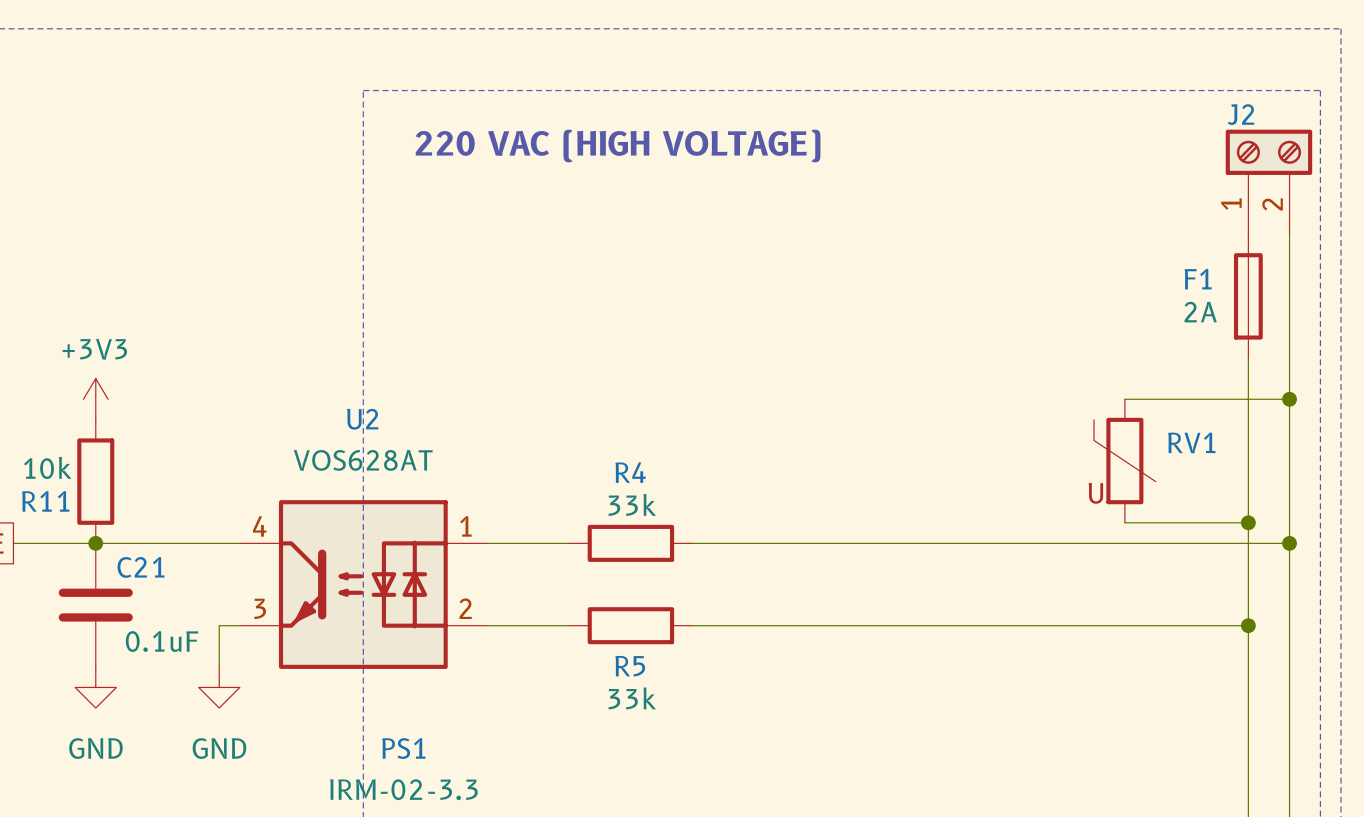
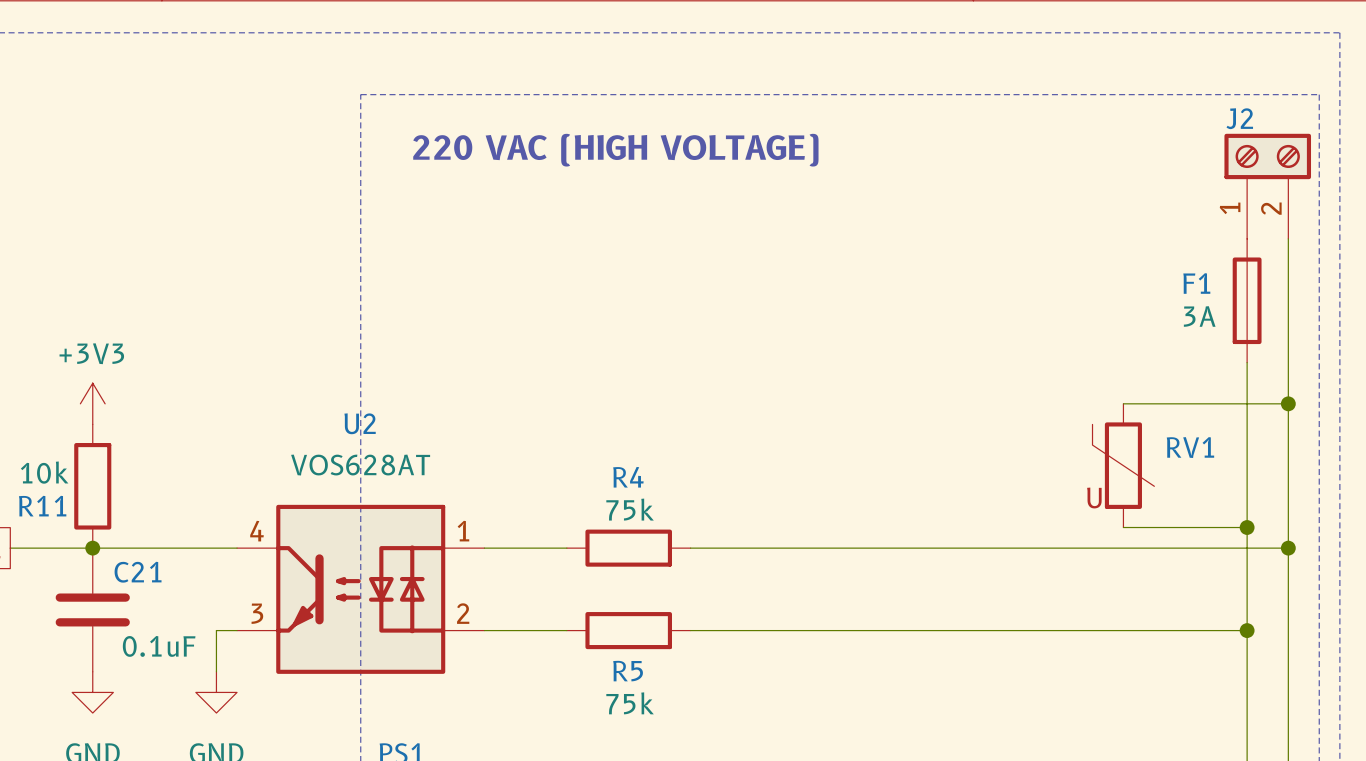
F1 value: 2A (1200, 312) -> 3A (1199, 316)
R4 value: 33k (632, 504) -> 75k (630, 509)
R5 value: 33k (632, 698) -> 75k (630, 703)

